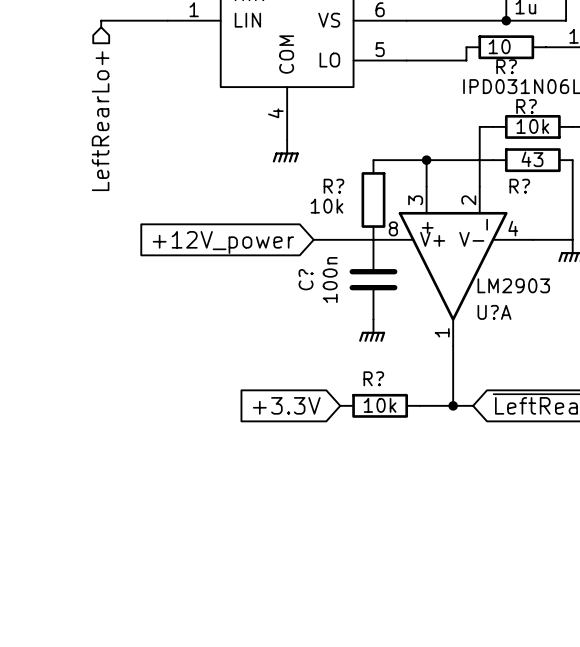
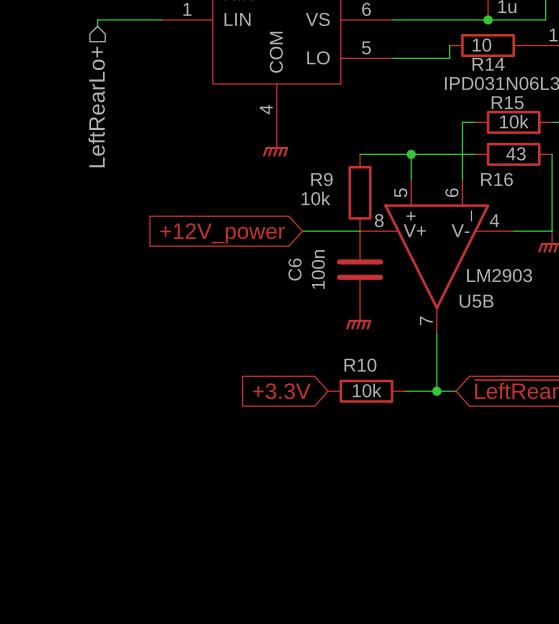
R? name: R? (506, 66) -> R14 (488, 64)
R? name: R? (526, 106) -> R15 (507, 102)
R? name: R? (333, 186) -> R9 (321, 179)
R? name: R? (519, 186) -> R16 (496, 179)
U?A pin number: 3 (415, 200) -> 5 (400, 192)
U?A pin number: 2 (468, 200) -> 6 (451, 192)
C? name: C? (306, 279) -> C6 (295, 269)
U?A name: U?A (494, 312) -> U5B (476, 301)
U?A pin number: 1 (442, 332) -> 7 (426, 320)
R? name: R? (373, 378) -> R10 (360, 365)

